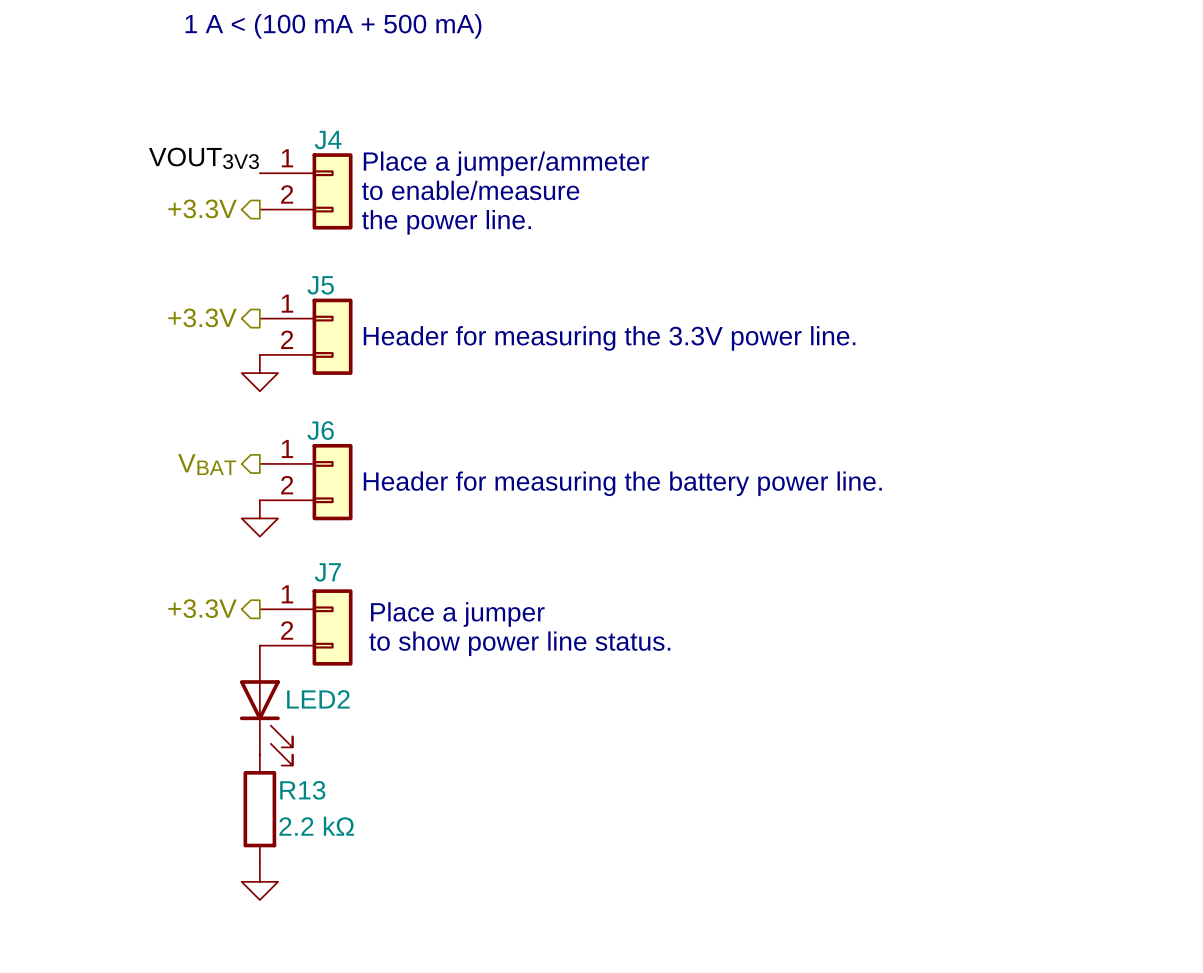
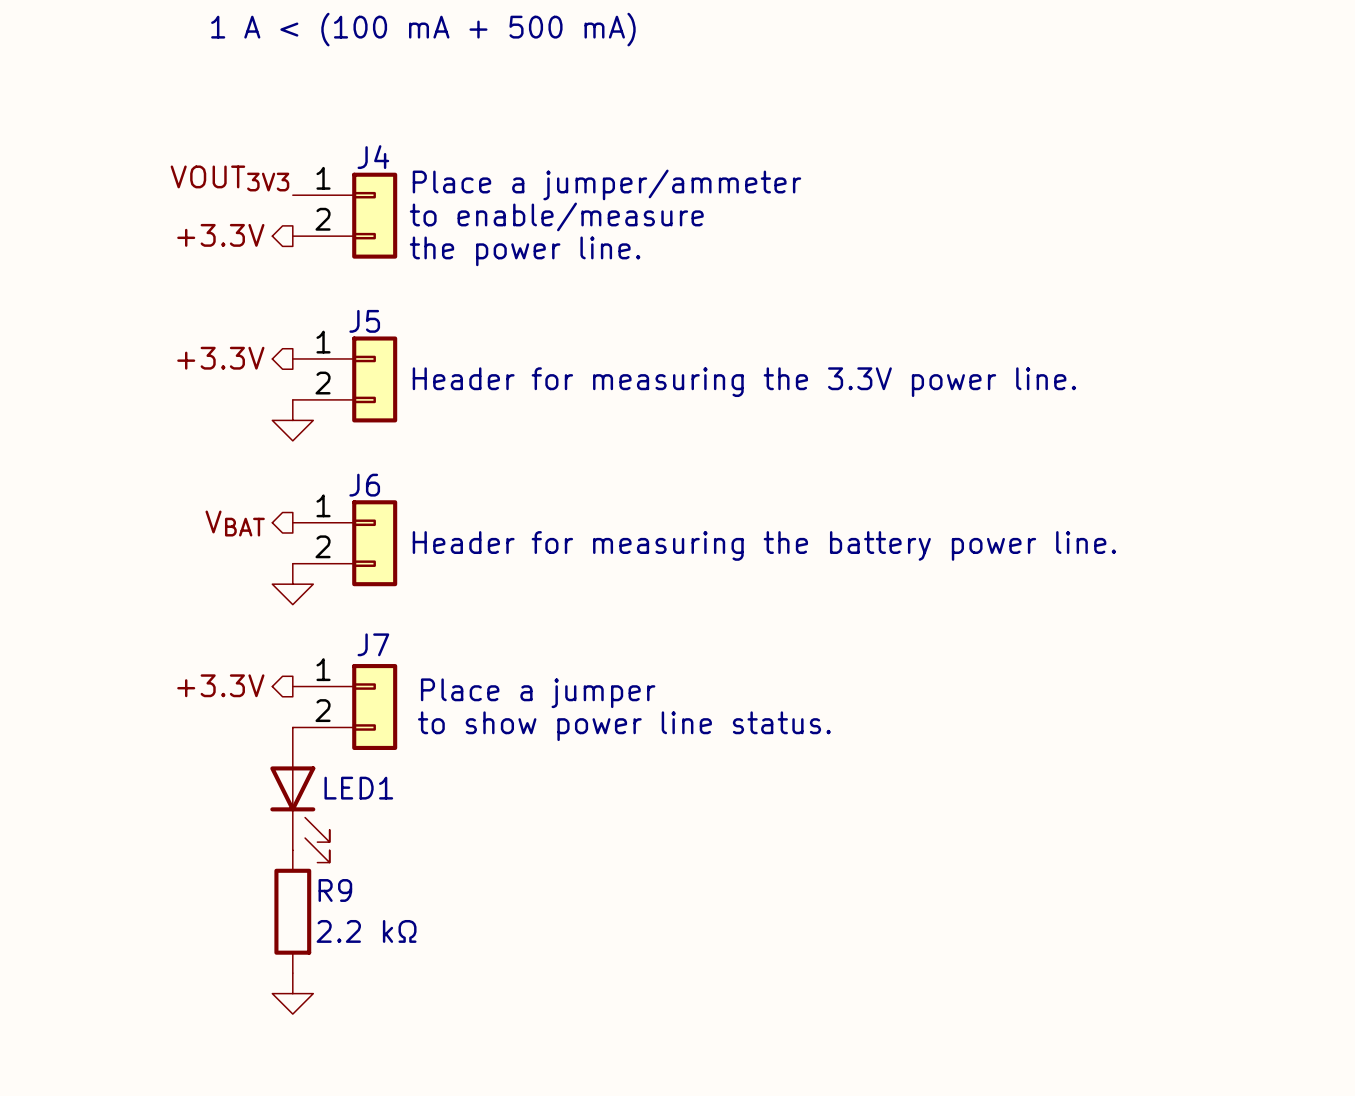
LED2 name: LED2 (318, 699) -> LED1 (358, 788)
R13 name: R13 (302, 790) -> R9 (335, 890)

